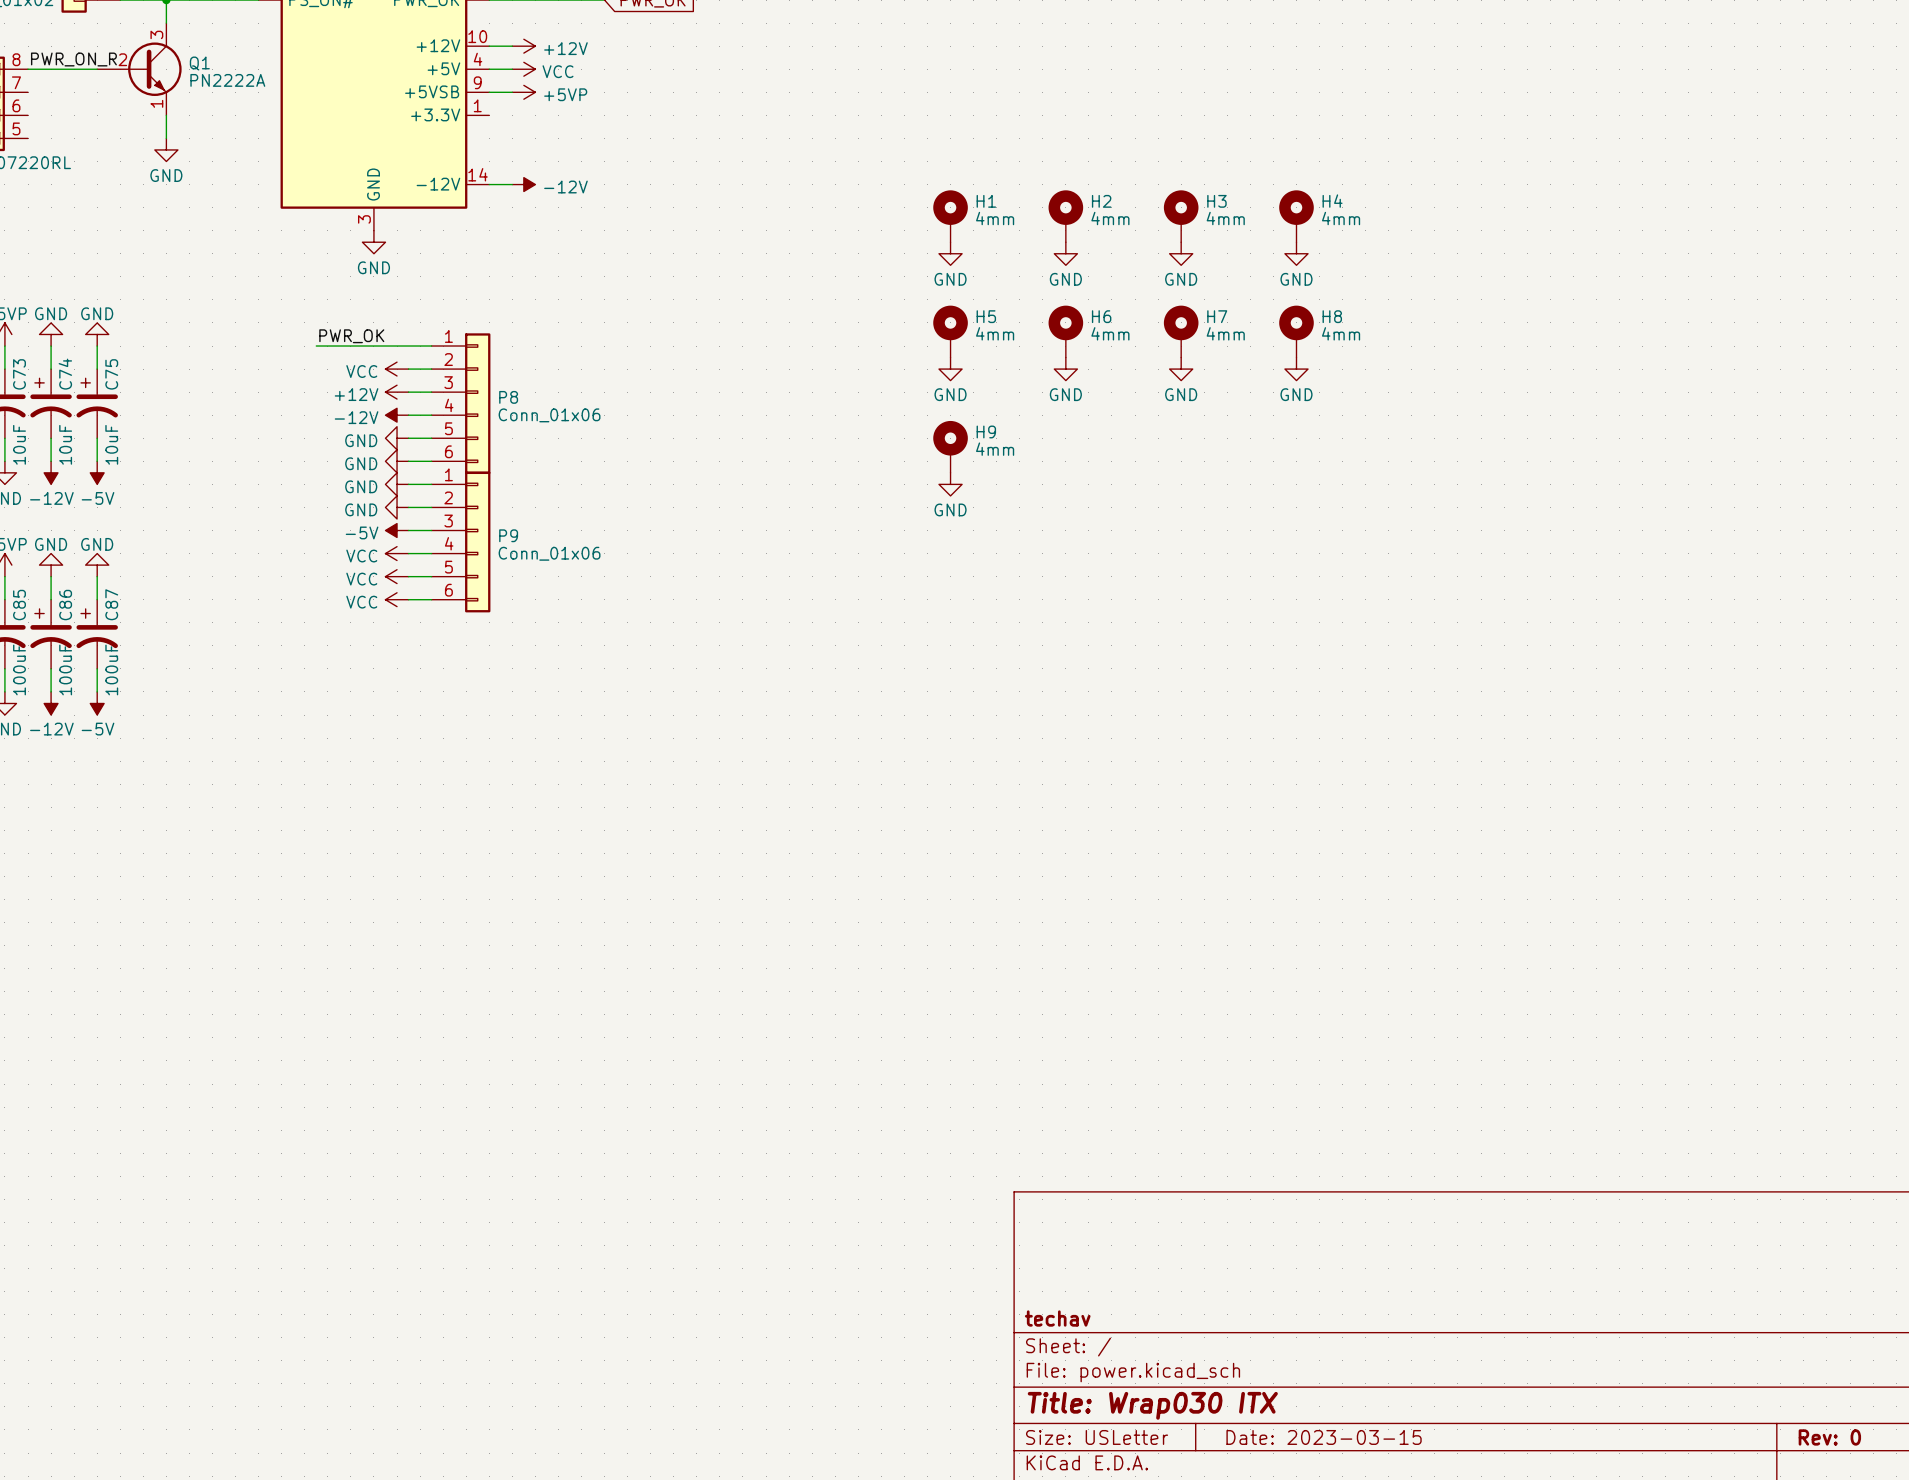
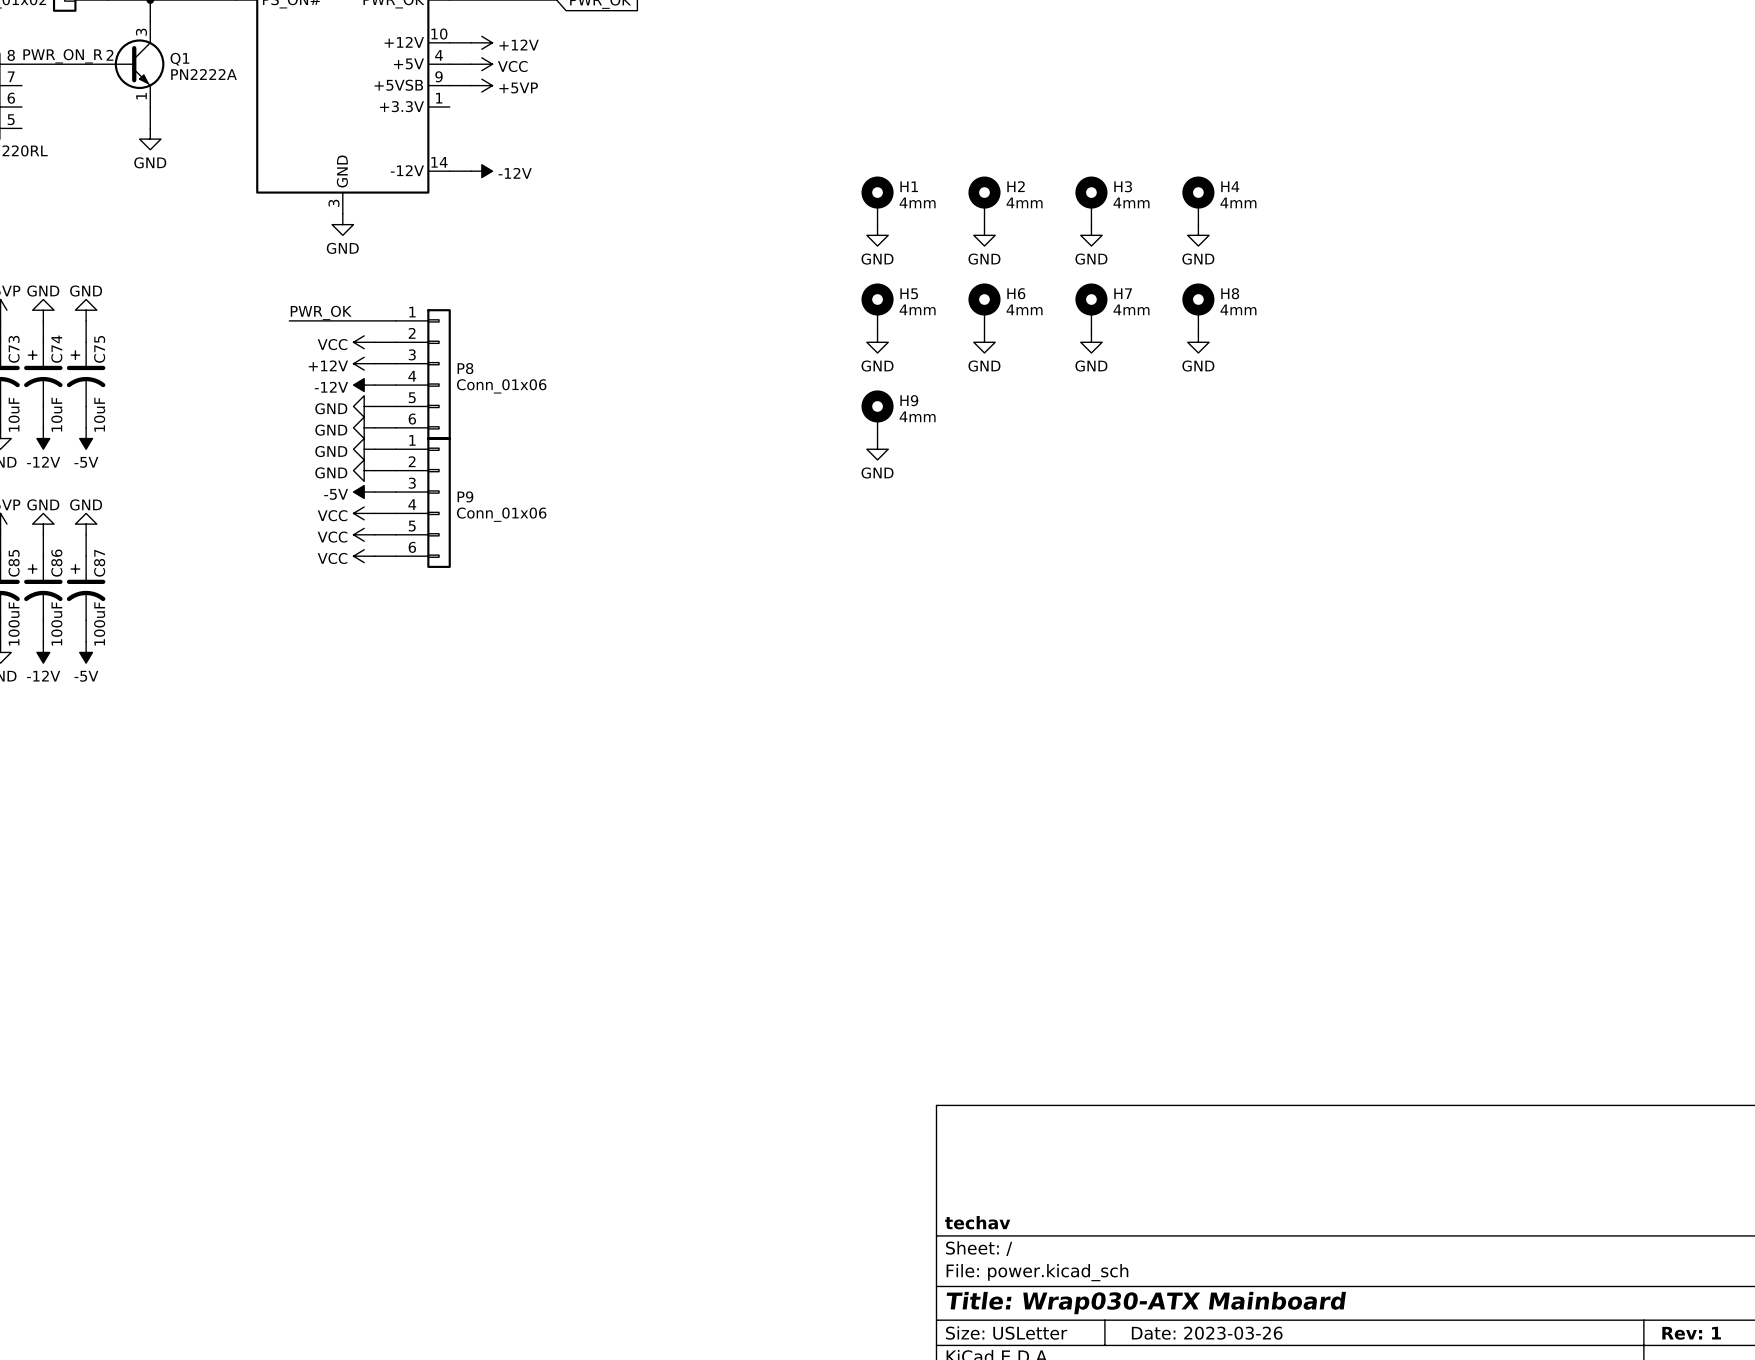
title block: Title: Wrap030 ITX (1152, 1405) -> Title: Wrap030-ATX Mainboard (1146, 1303)
title block: Date: 2023-03-15 (1324, 1437) -> Date: 2023-03-26 (1207, 1333)
title block: Rev: 0 (1829, 1437) -> Rev: 1 (1691, 1333)

